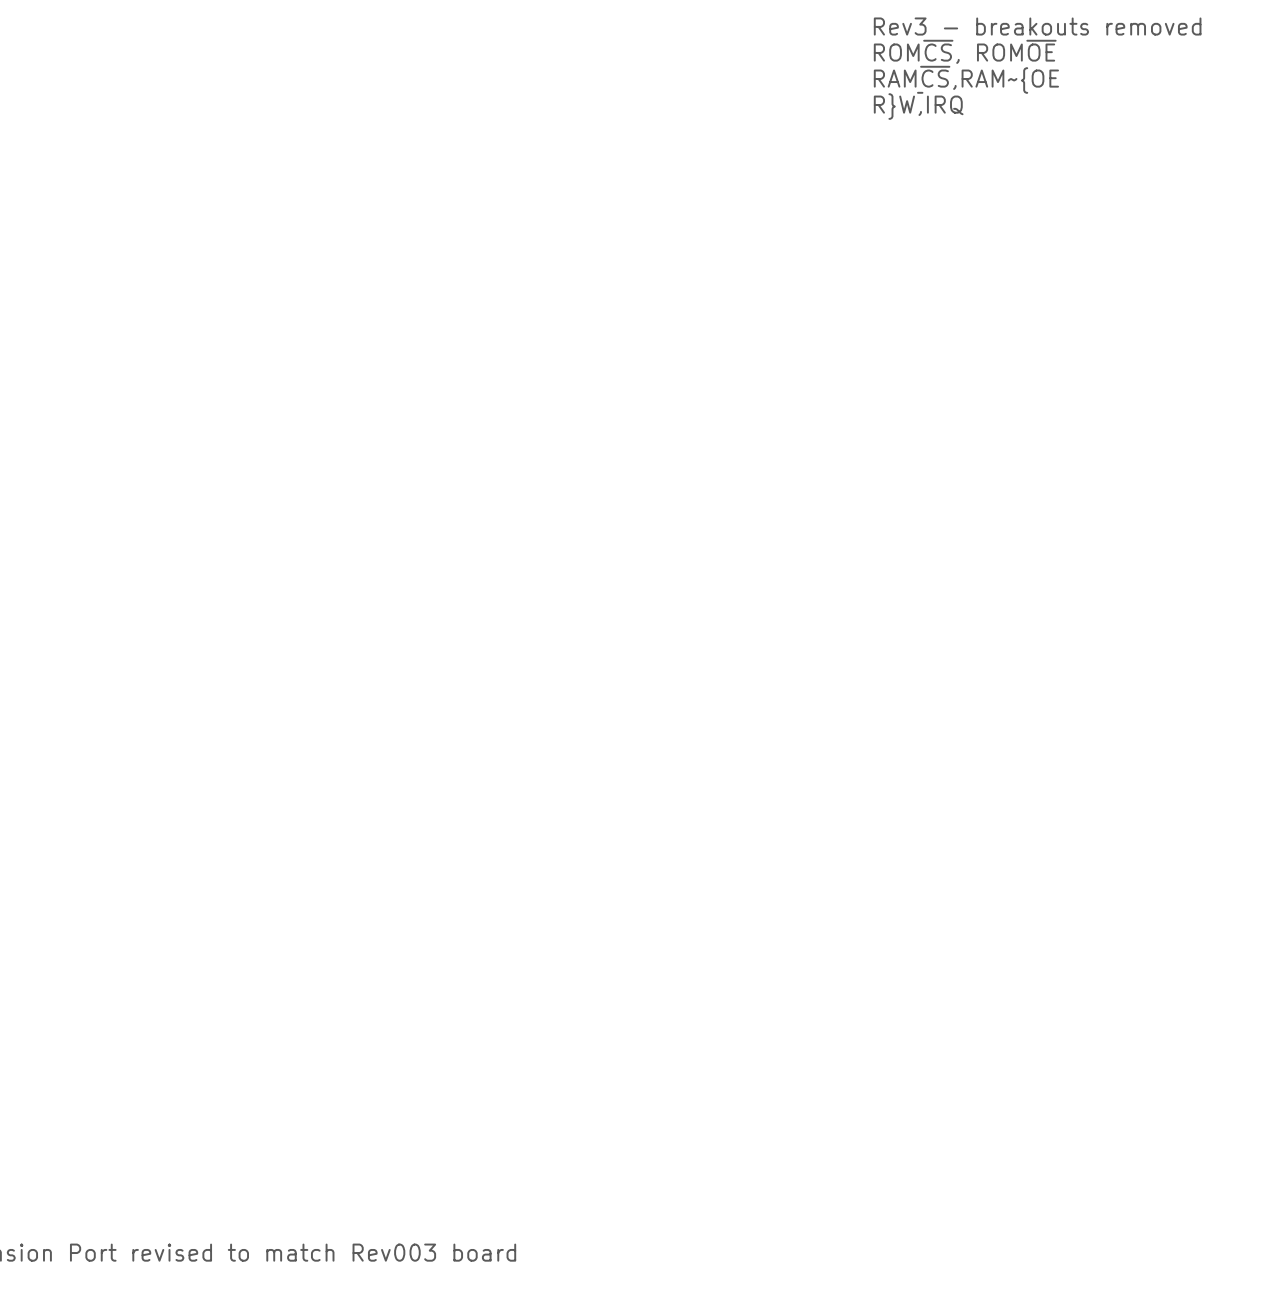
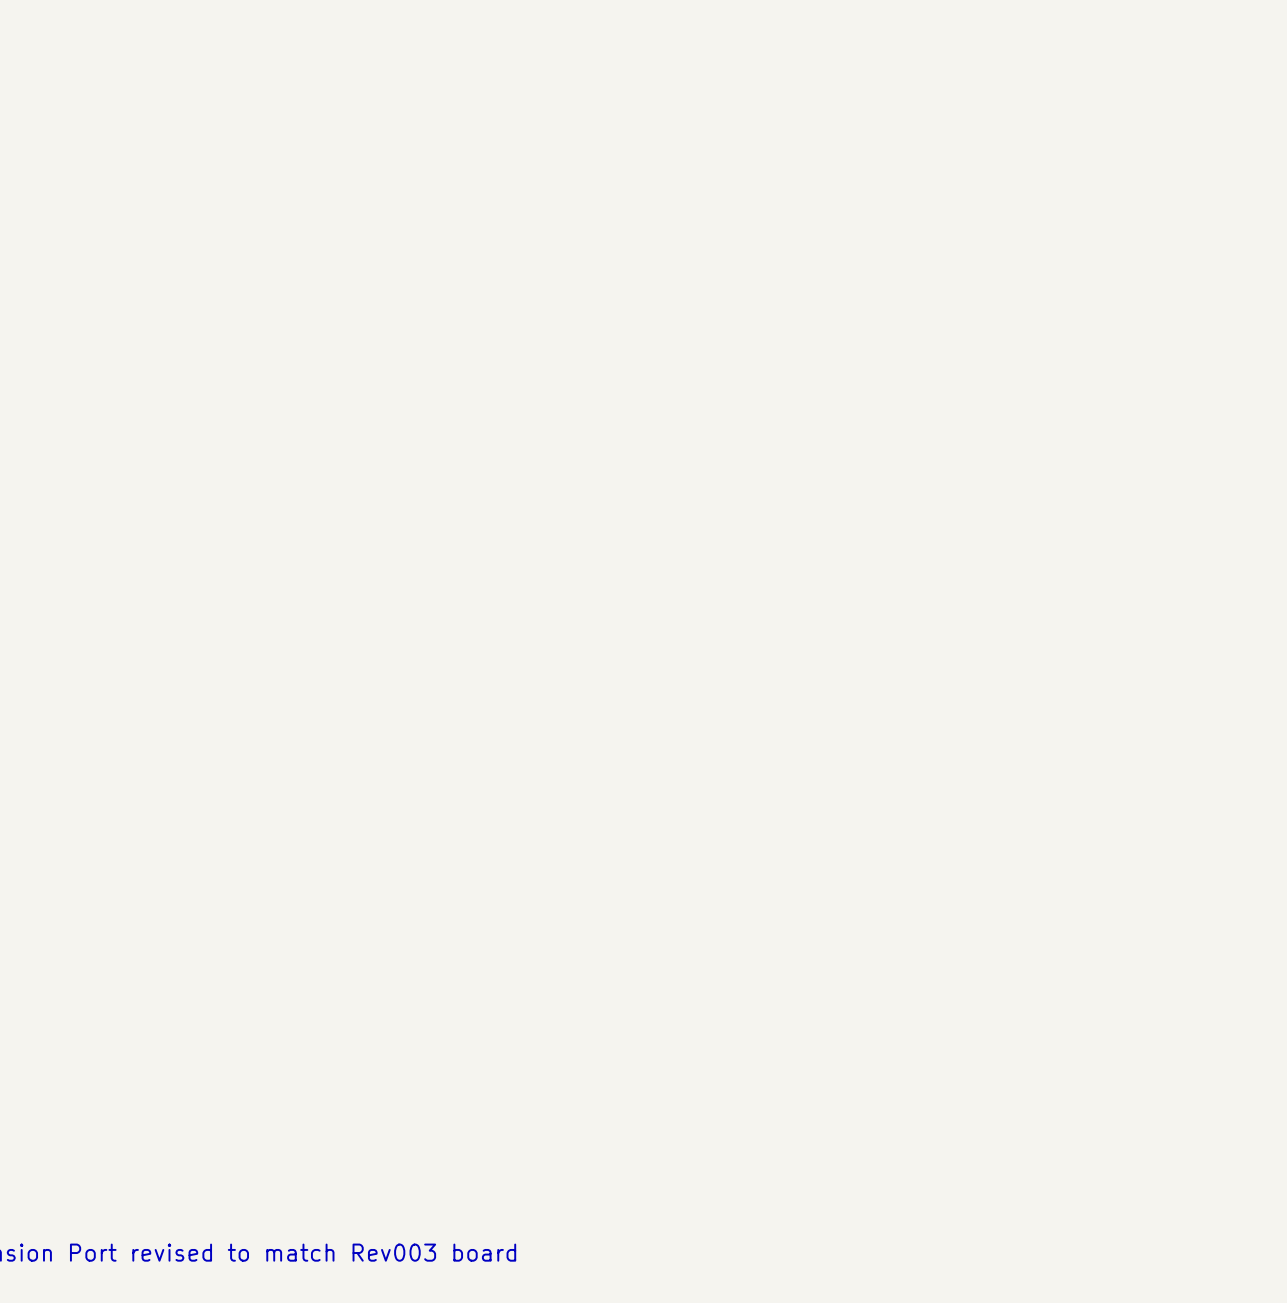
text: Rev3 - breakouts removed (1037, 26) -> none
text: ROM~{CS}, ROM~{OE} (965, 51) -> none
text: RAM~{CS},RAM~{OE (966, 79) -> none
text: R}W~{,}IRQ (918, 105) -> none

